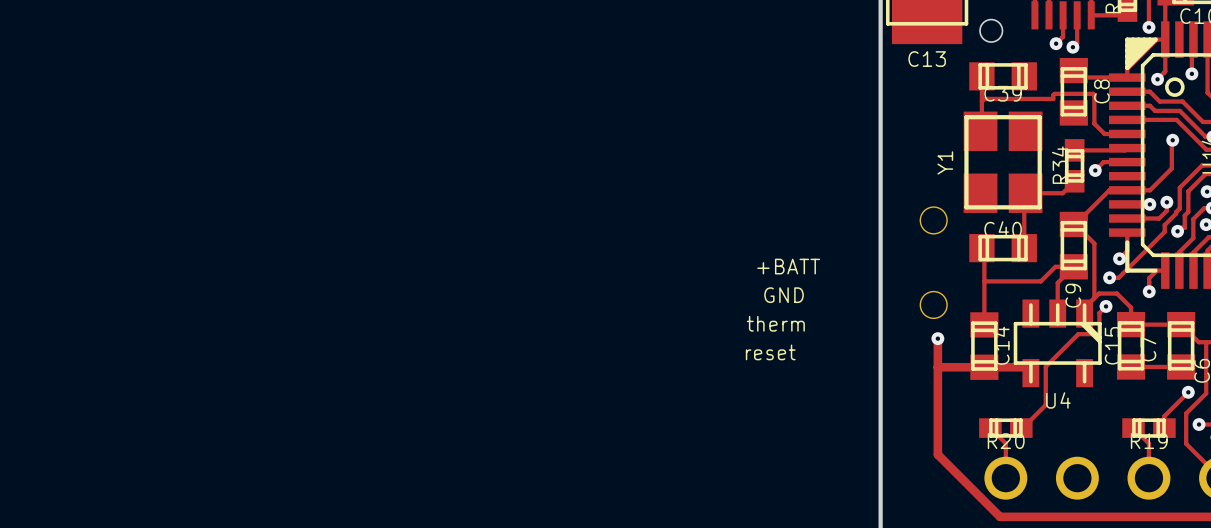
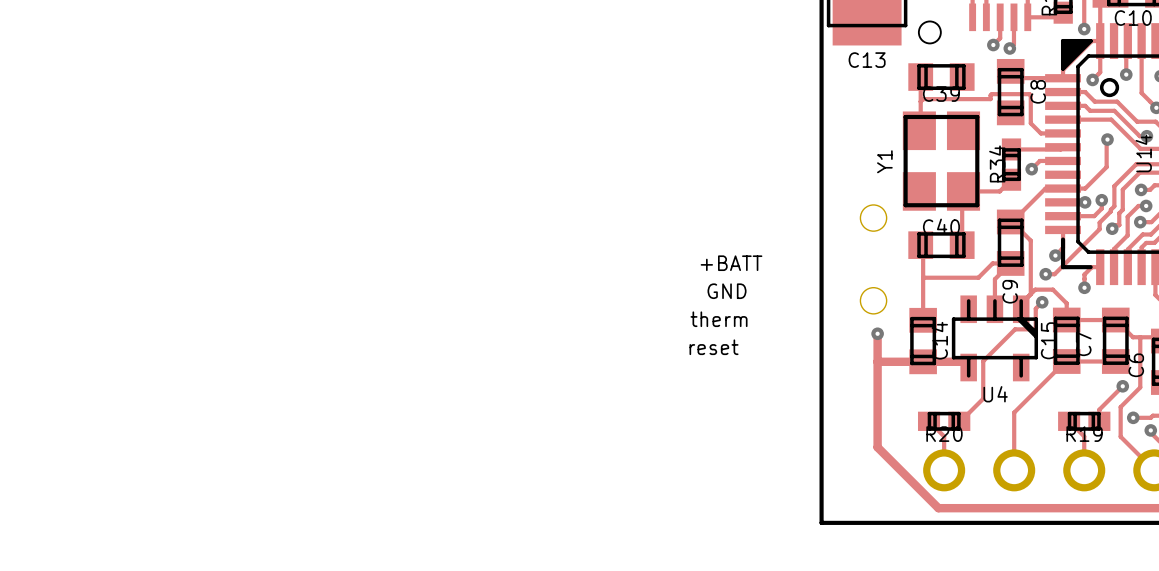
track: none -> (1066, 361) (1014, 412) (1014, 470)

